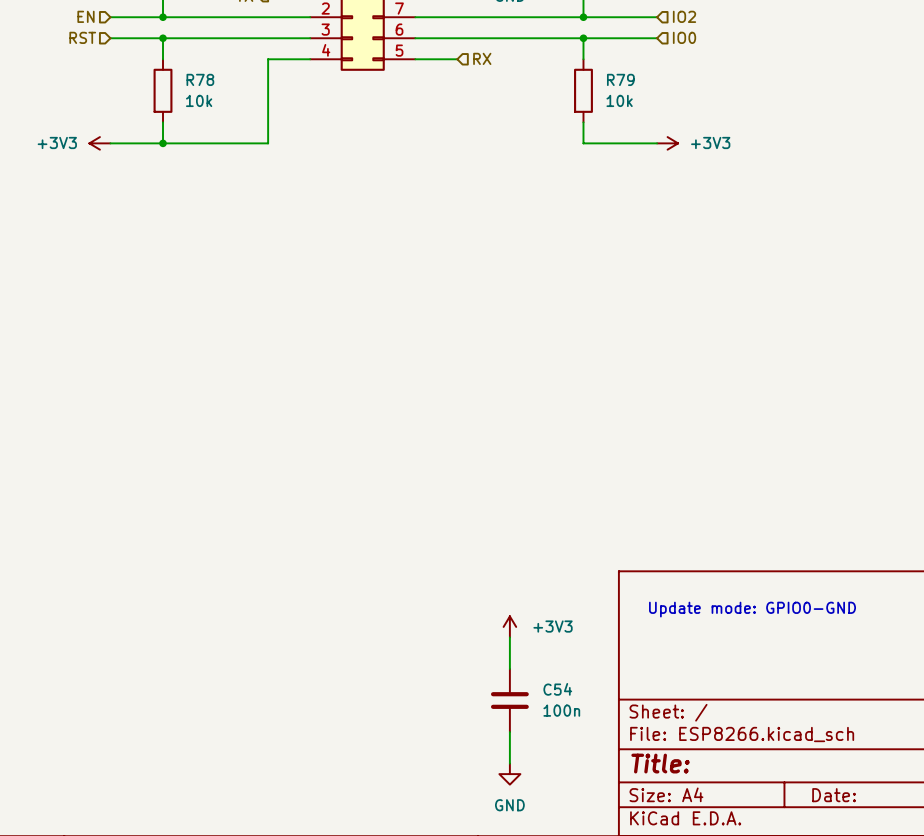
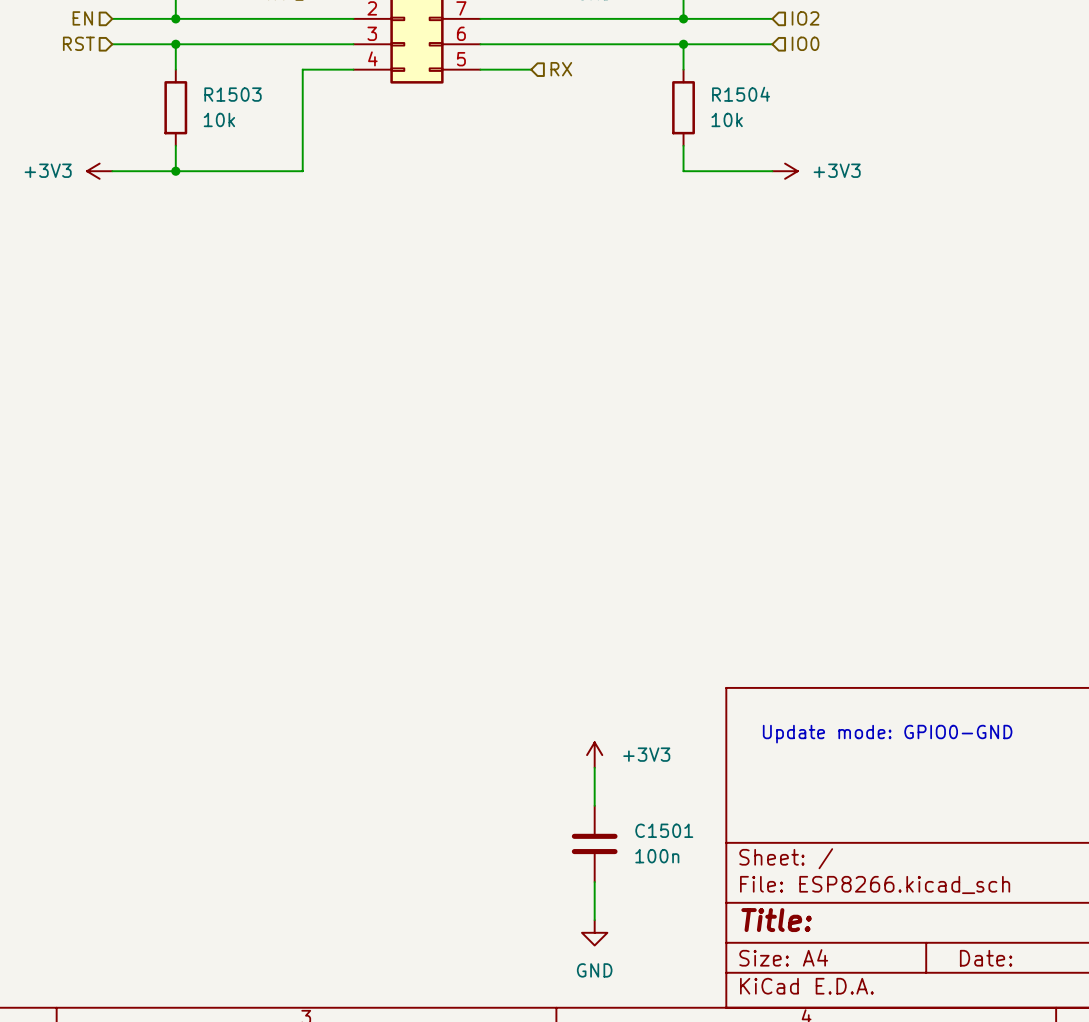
R78 name: R78 (200, 79) -> R1503 (233, 94)
R79 name: R79 (620, 79) -> R1504 (741, 94)
C54 name: C54 (557, 689) -> C1501 (664, 830)

